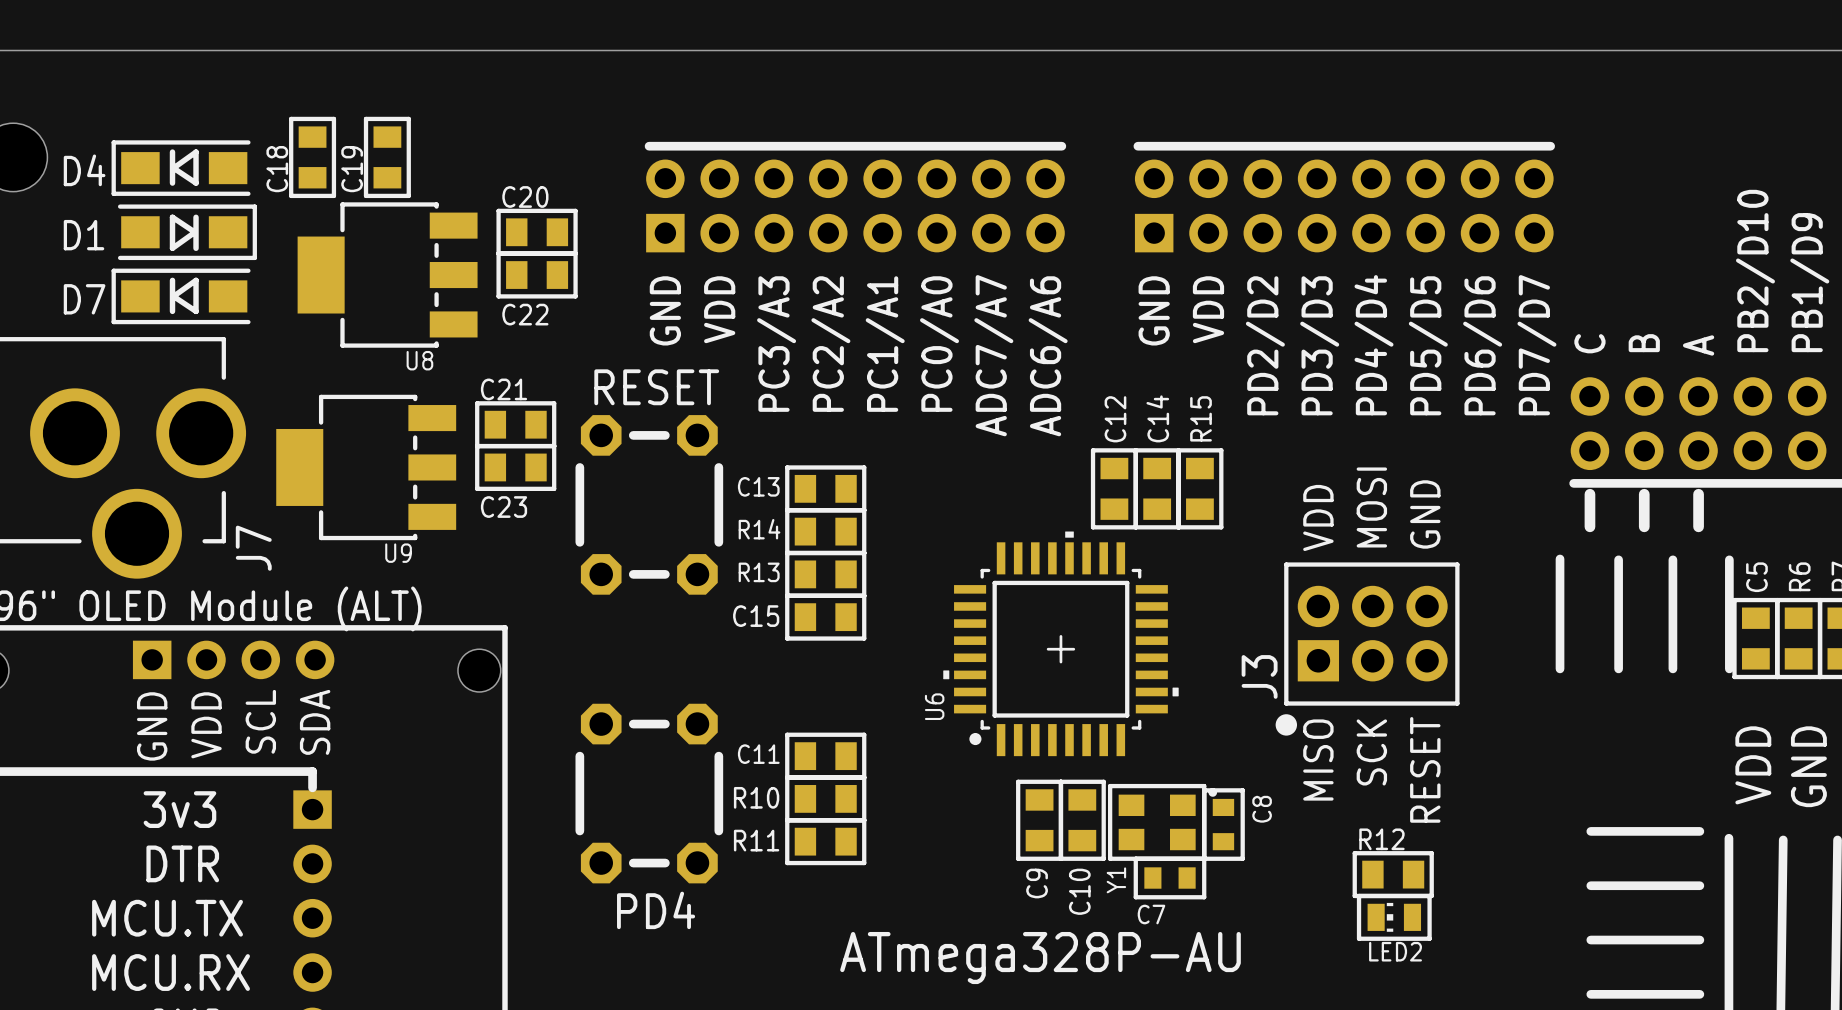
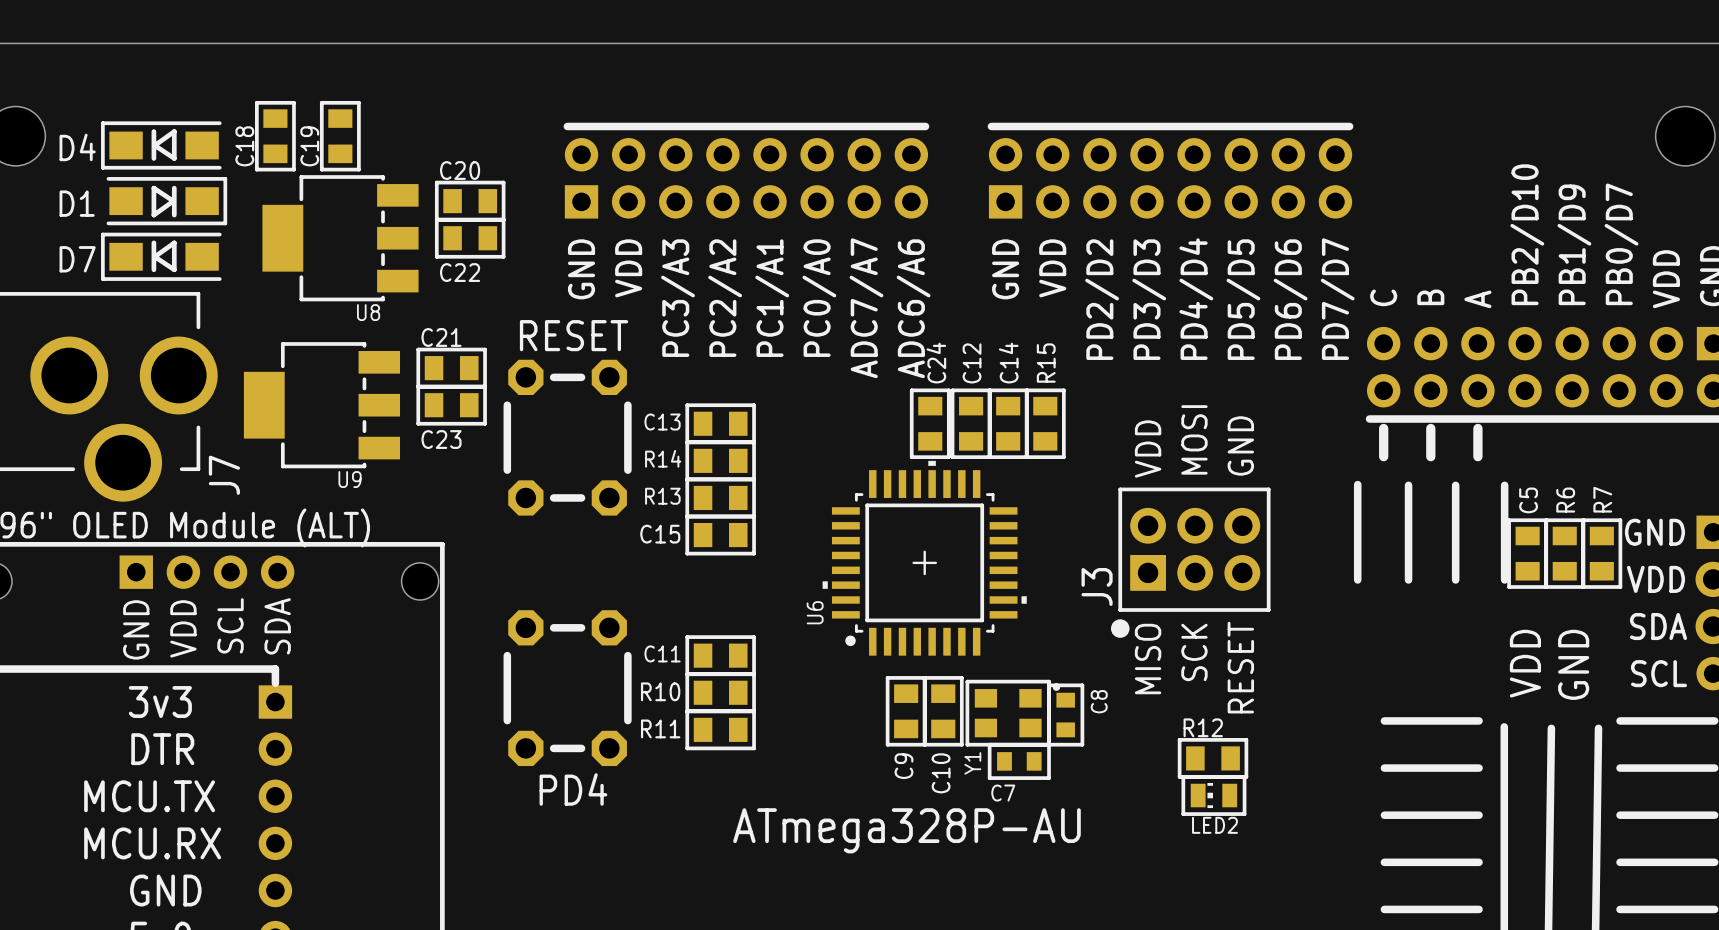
C24: none -> (930, 423)

